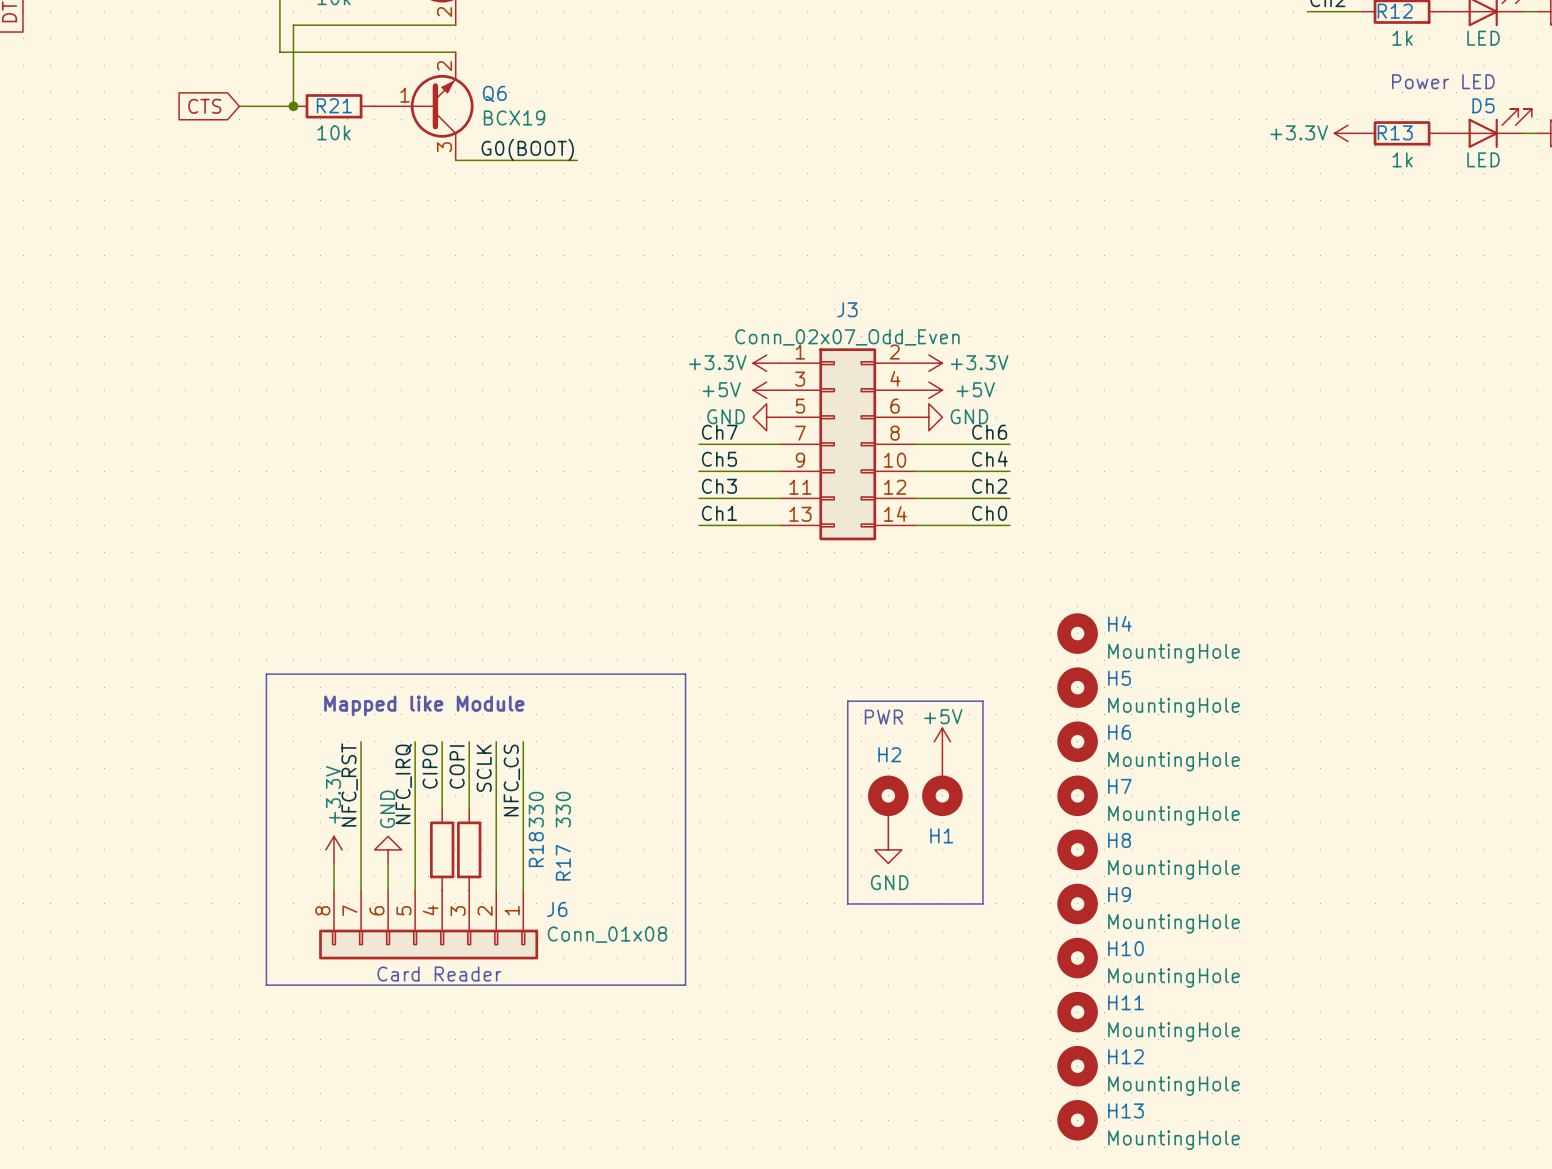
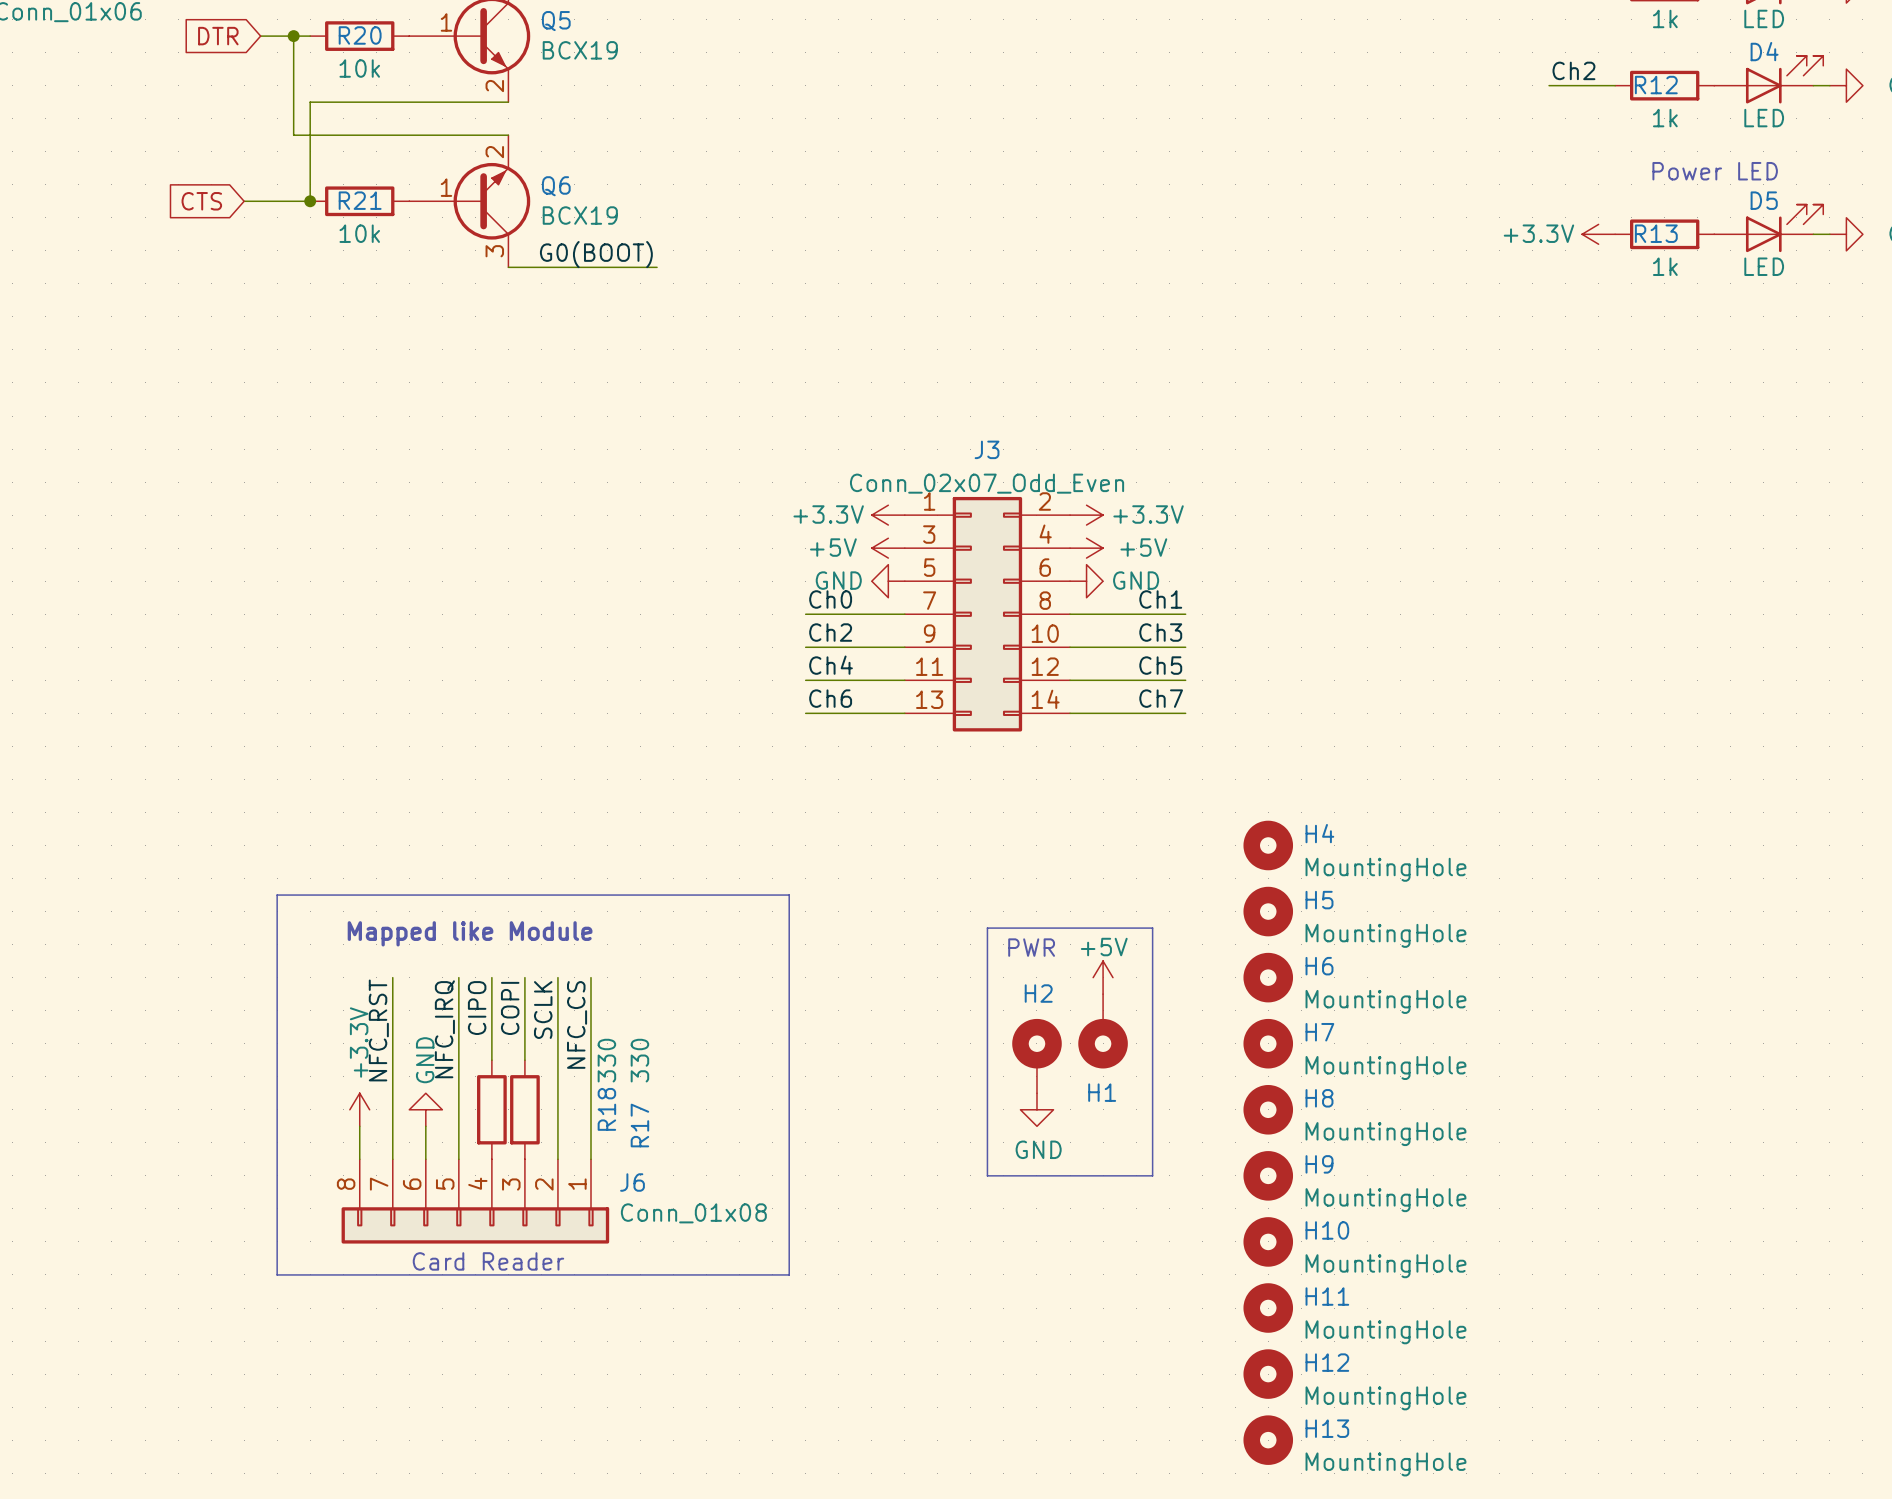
label: Ch7 (719, 432) -> Ch0 (830, 599)
label: Ch6 (989, 432) -> Ch1 (1160, 599)
label: Ch4 (989, 458) -> Ch3 (1160, 632)
label: Ch5 (719, 459) -> Ch2 (830, 632)
label: Ch3 (719, 486) -> Ch4 (831, 665)
label: Ch2 (989, 486) -> Ch5 (1160, 665)
label: Ch1 (719, 513) -> Ch6 (830, 698)
label: Ch0 (989, 513) -> Ch7 (1161, 698)

